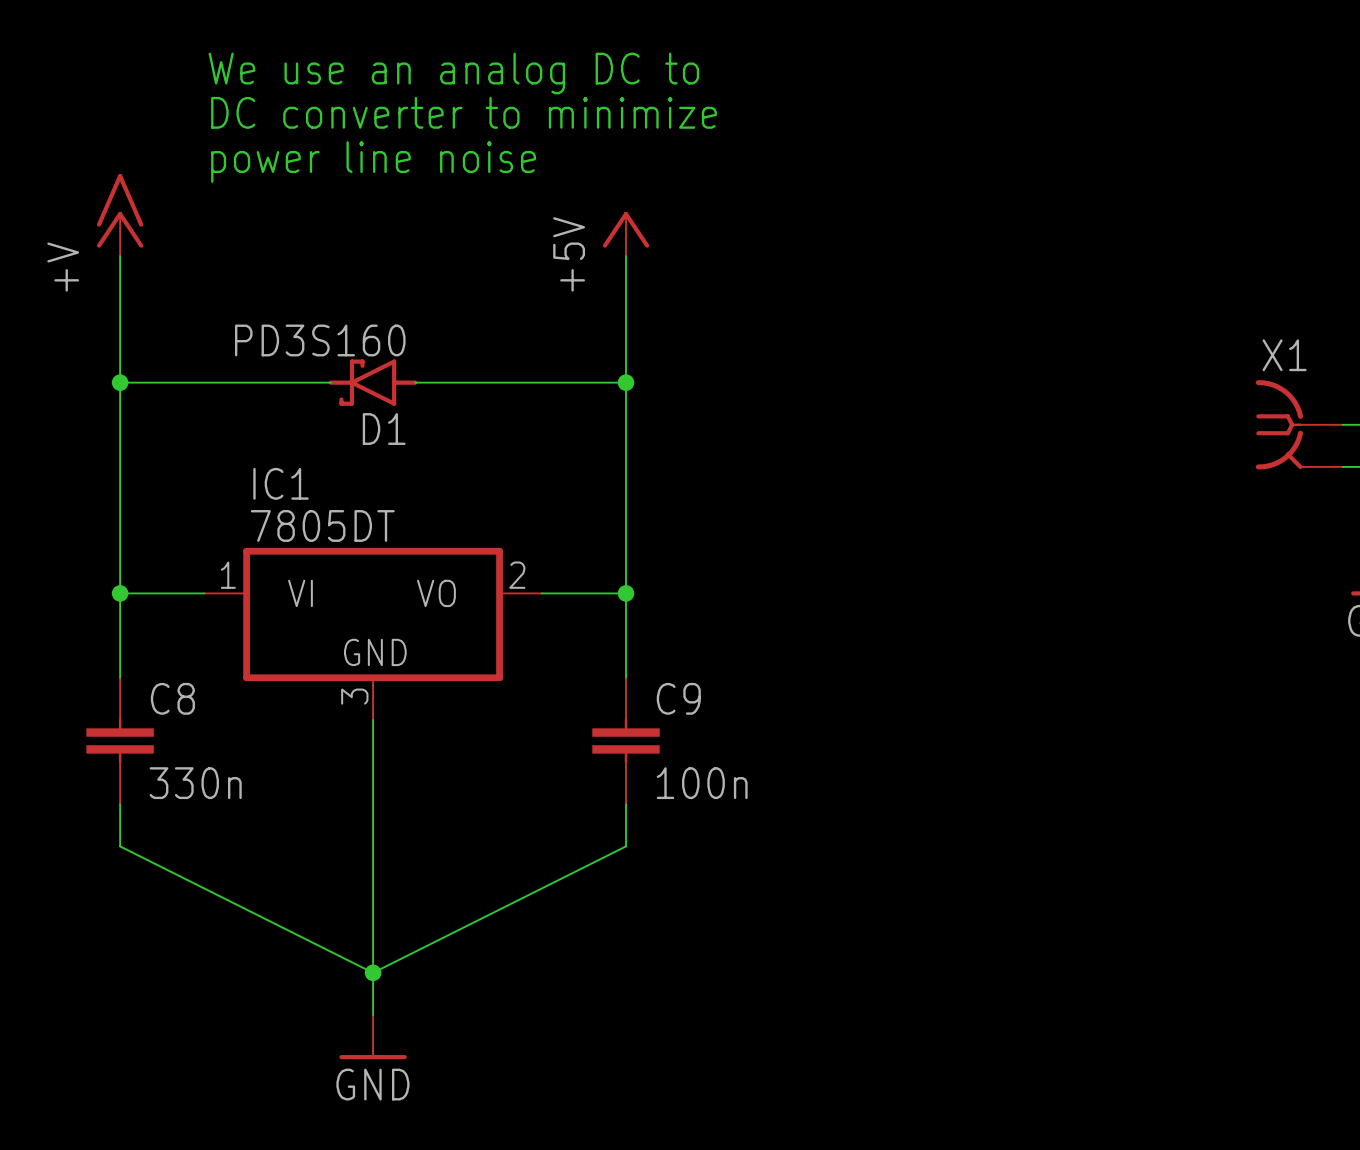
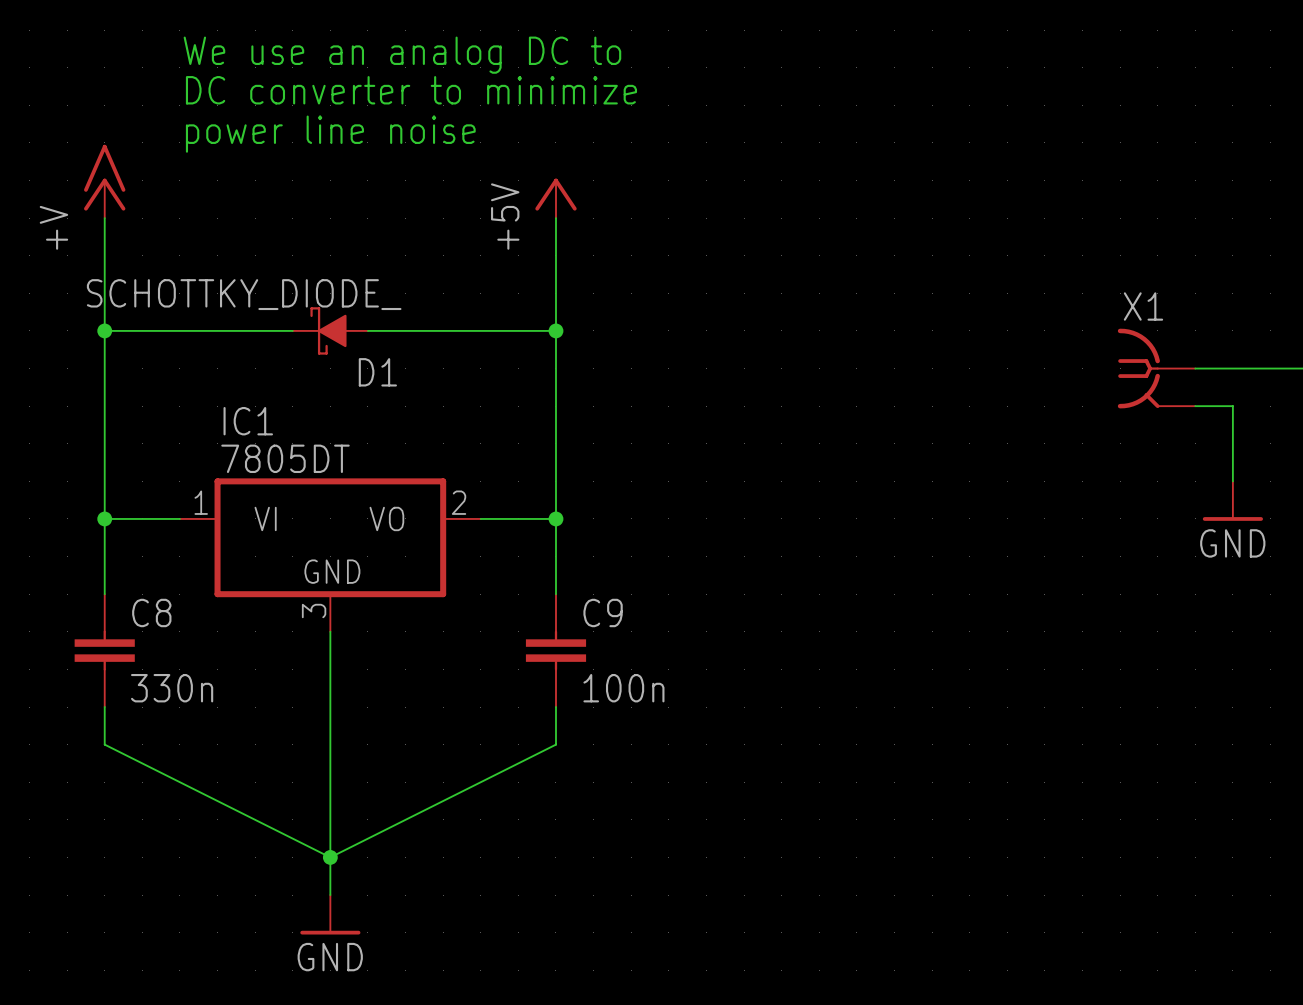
D1 value: PD3S160 (320, 340) -> SCHOTTKY_DIODE_ (244, 294)
D1 symbol: [328, 359, 418, 406] -> [292, 307, 368, 355]
D1 name position: D1 (384, 429) -> D1 (377, 372)

